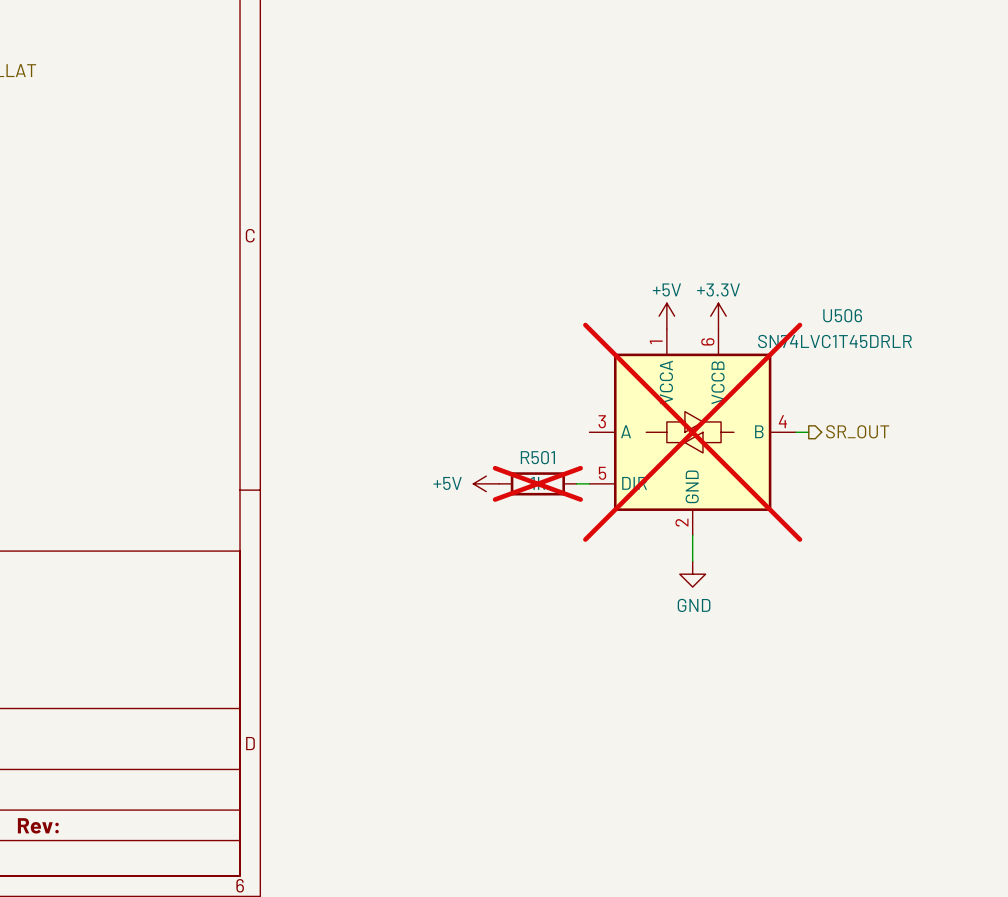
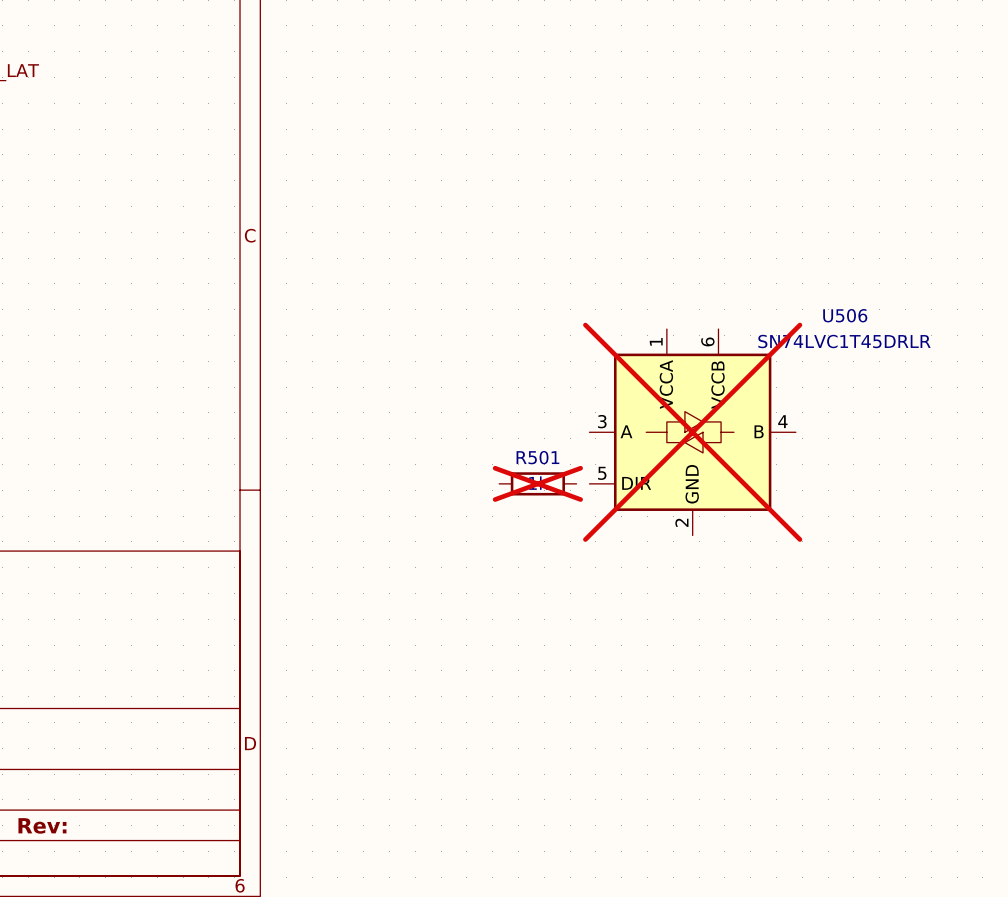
power symbol: +5V (666, 316) -> none
power symbol: +3.3V (718, 316) -> none
hierarchical label: SR_OUT (857, 431) -> none
wire: (795, 432) (808, 432) -> none
power symbol: +5V (486, 483) -> none
wire: (576, 483) (589, 483) -> none
wire: (692, 535) (692, 561) -> none
power symbol: GND (692, 574) -> none

